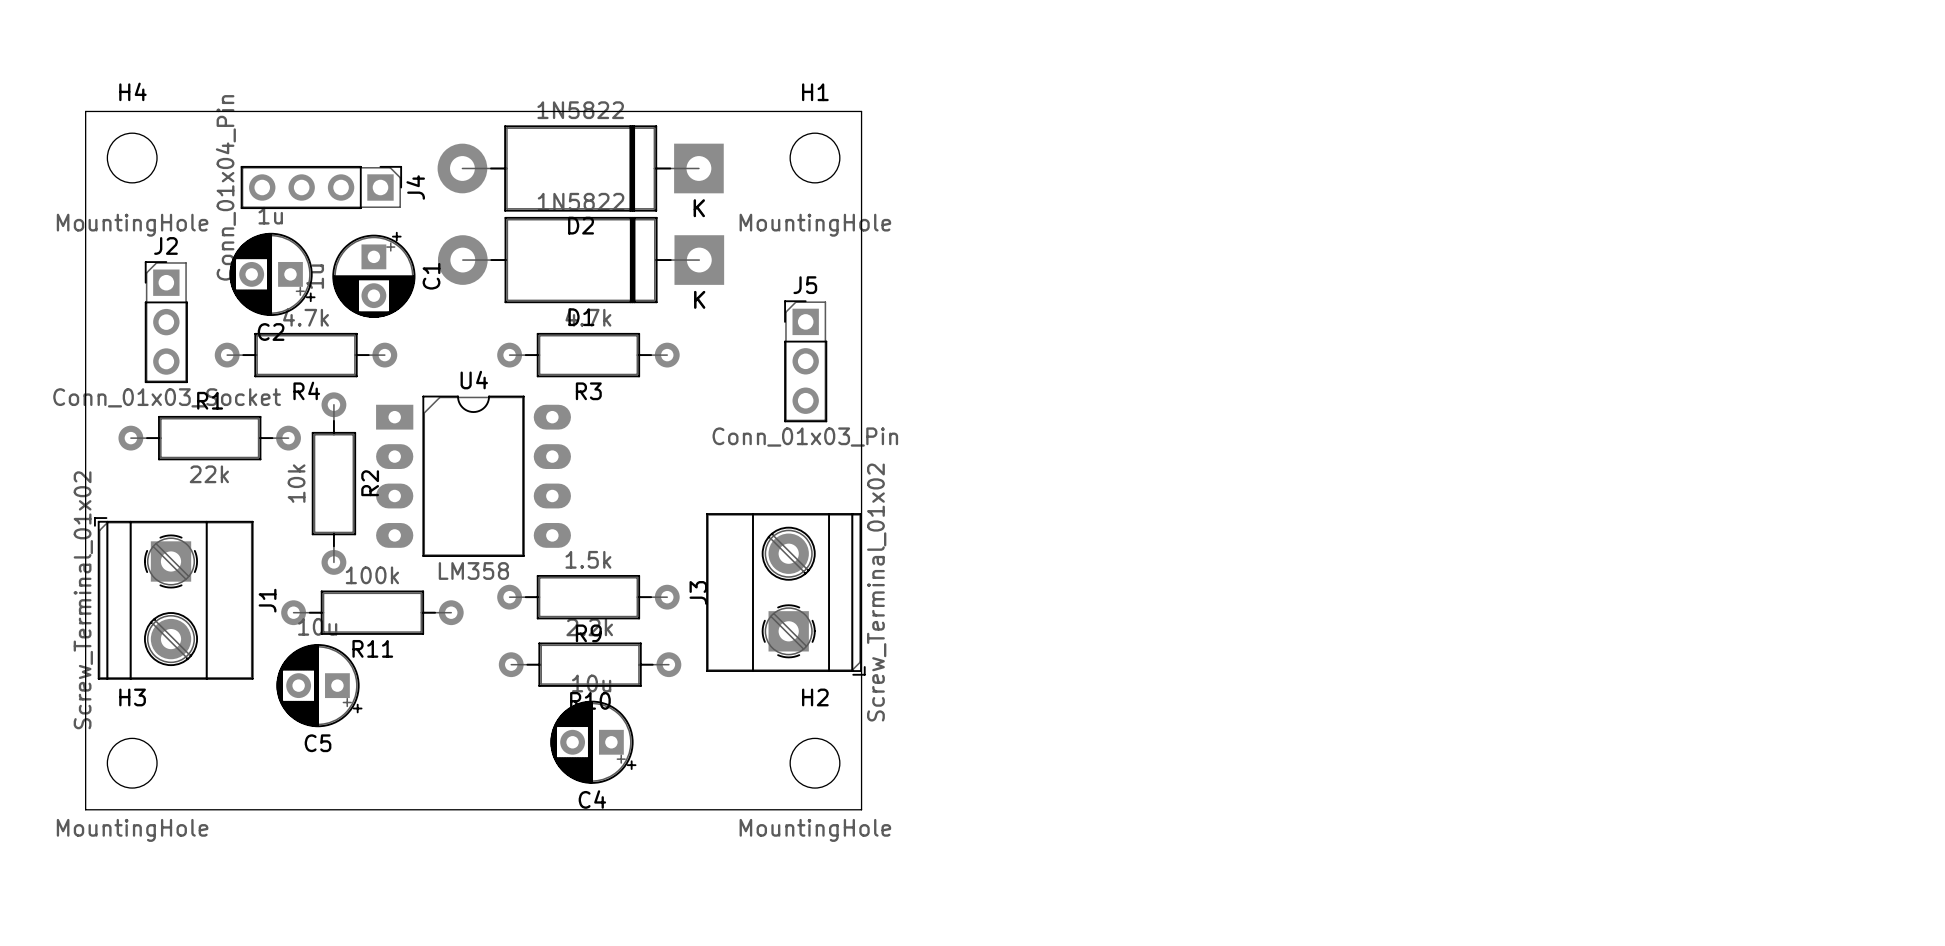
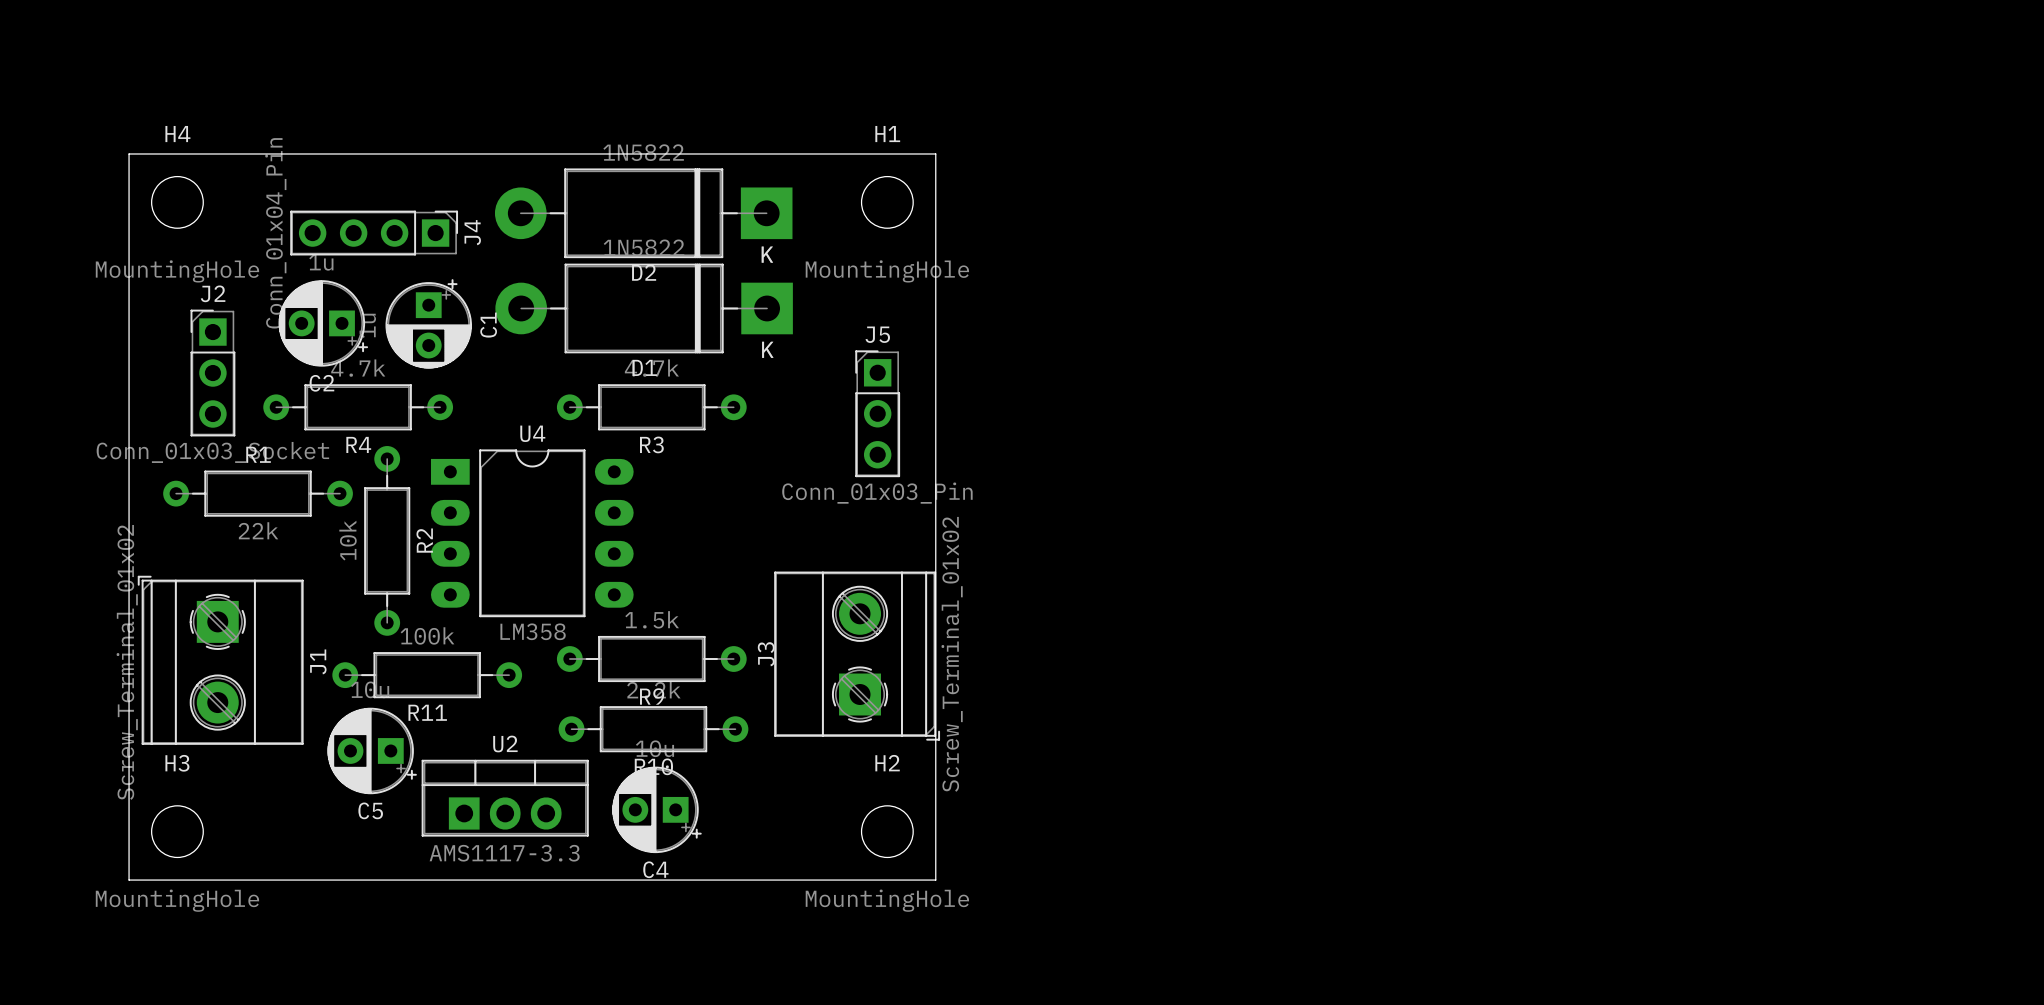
U2: none -> AMS1117-3.3 (505, 798)

